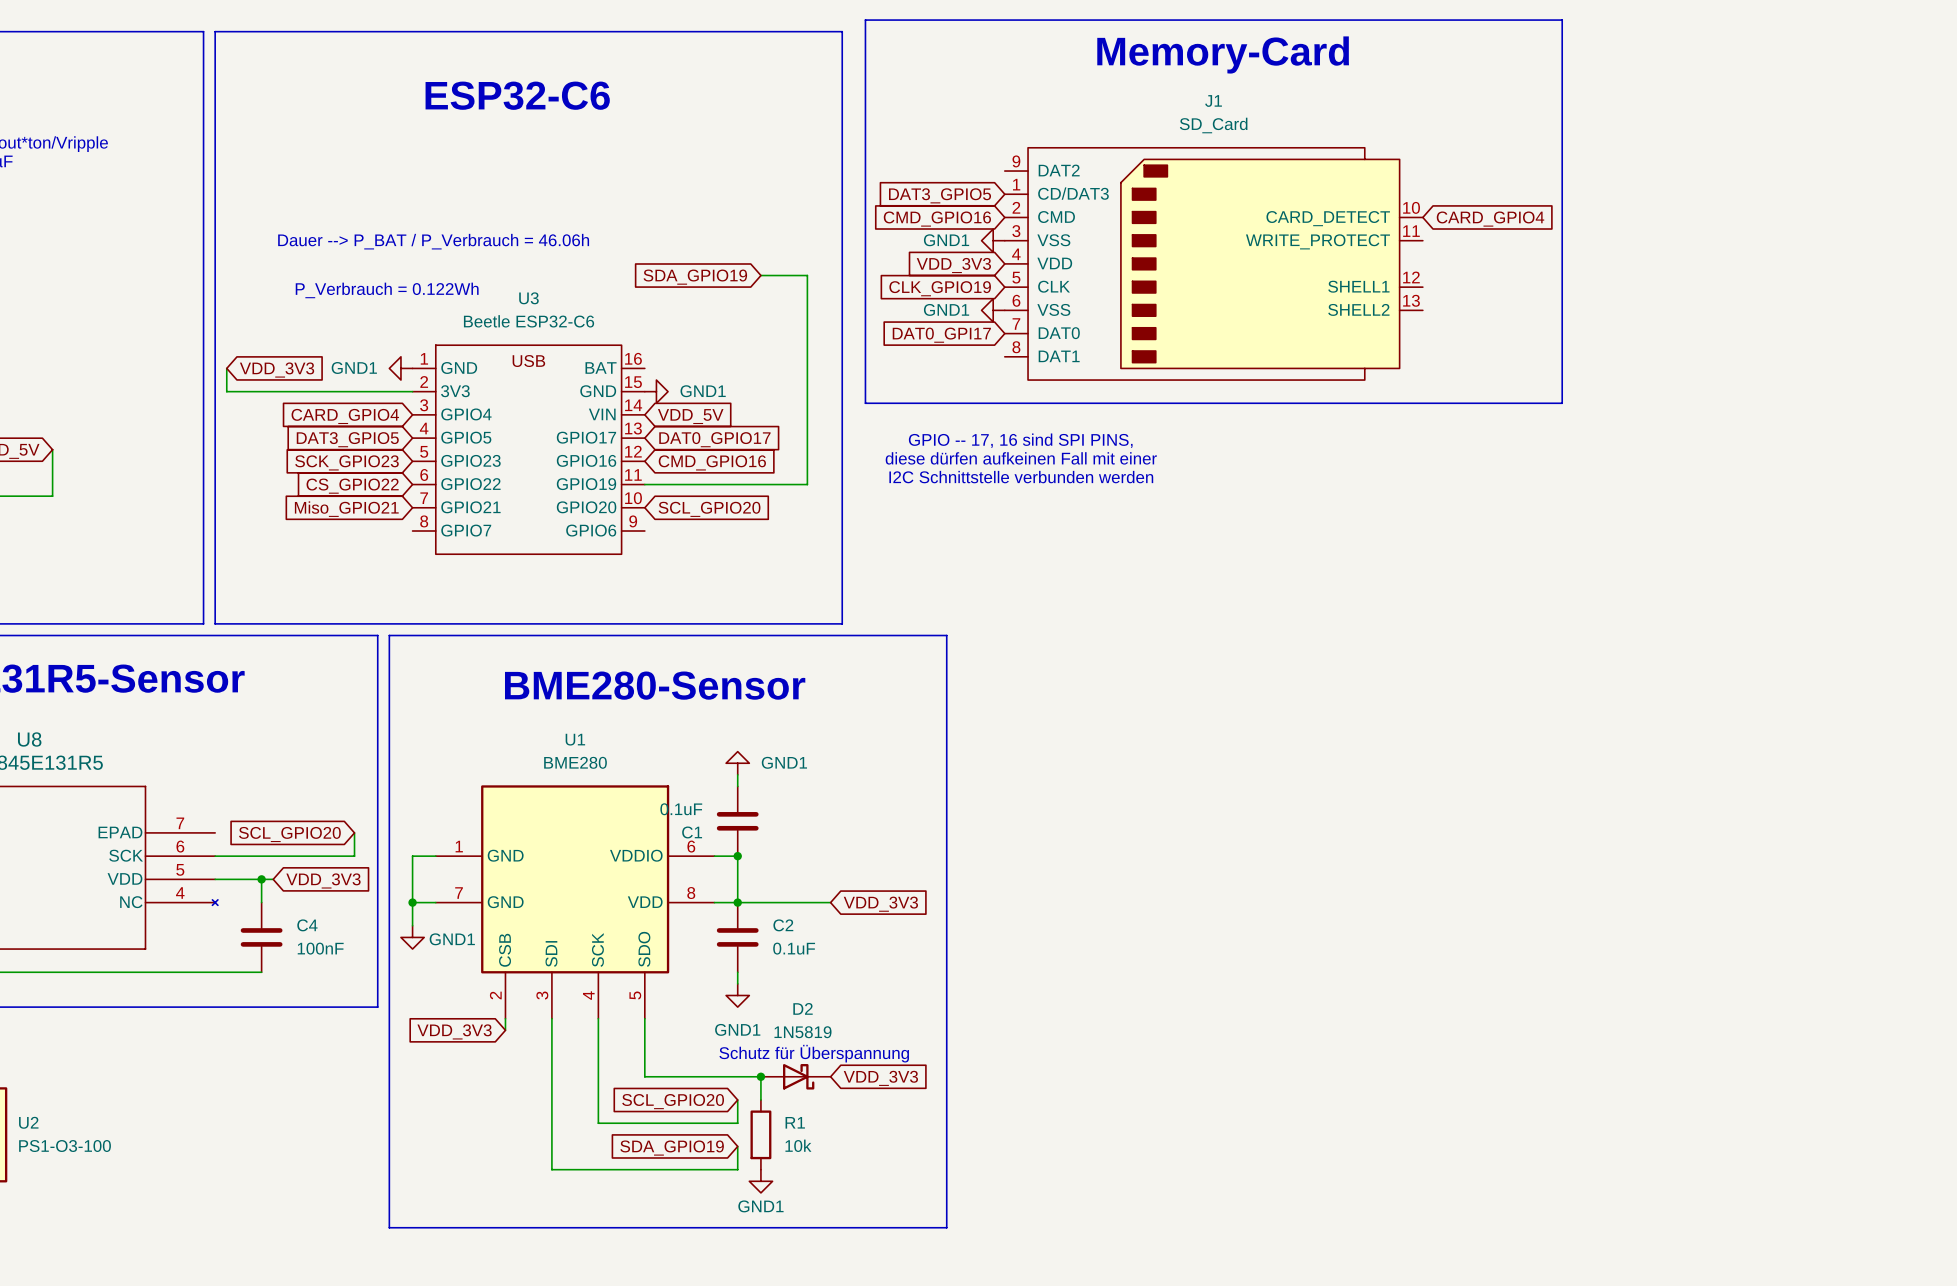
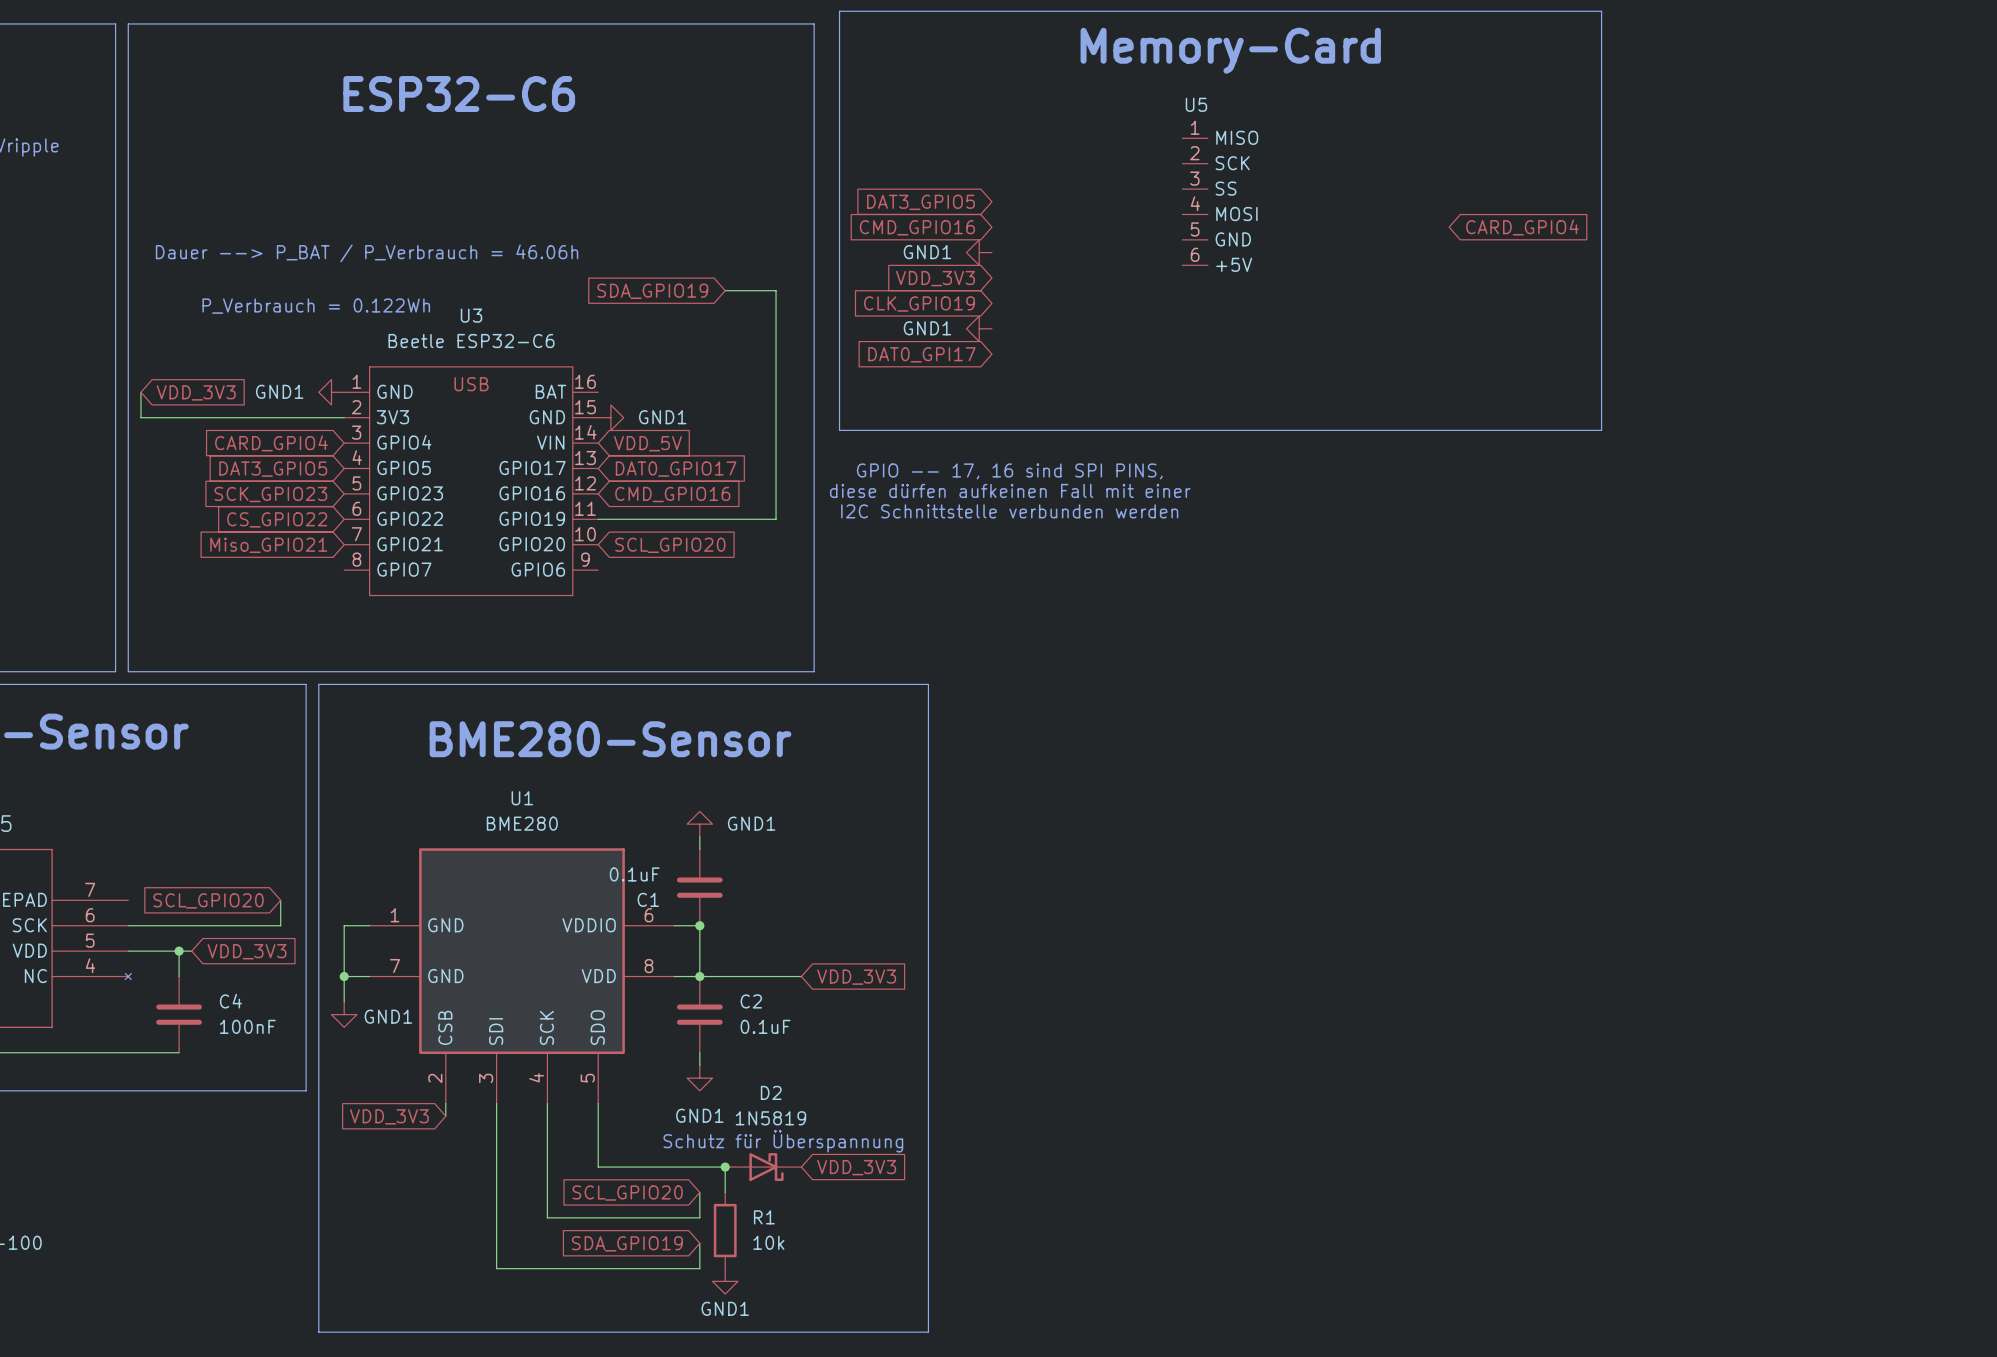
U5: none -> (1195, 201)
J1: SD_Card (1213, 263) -> none

